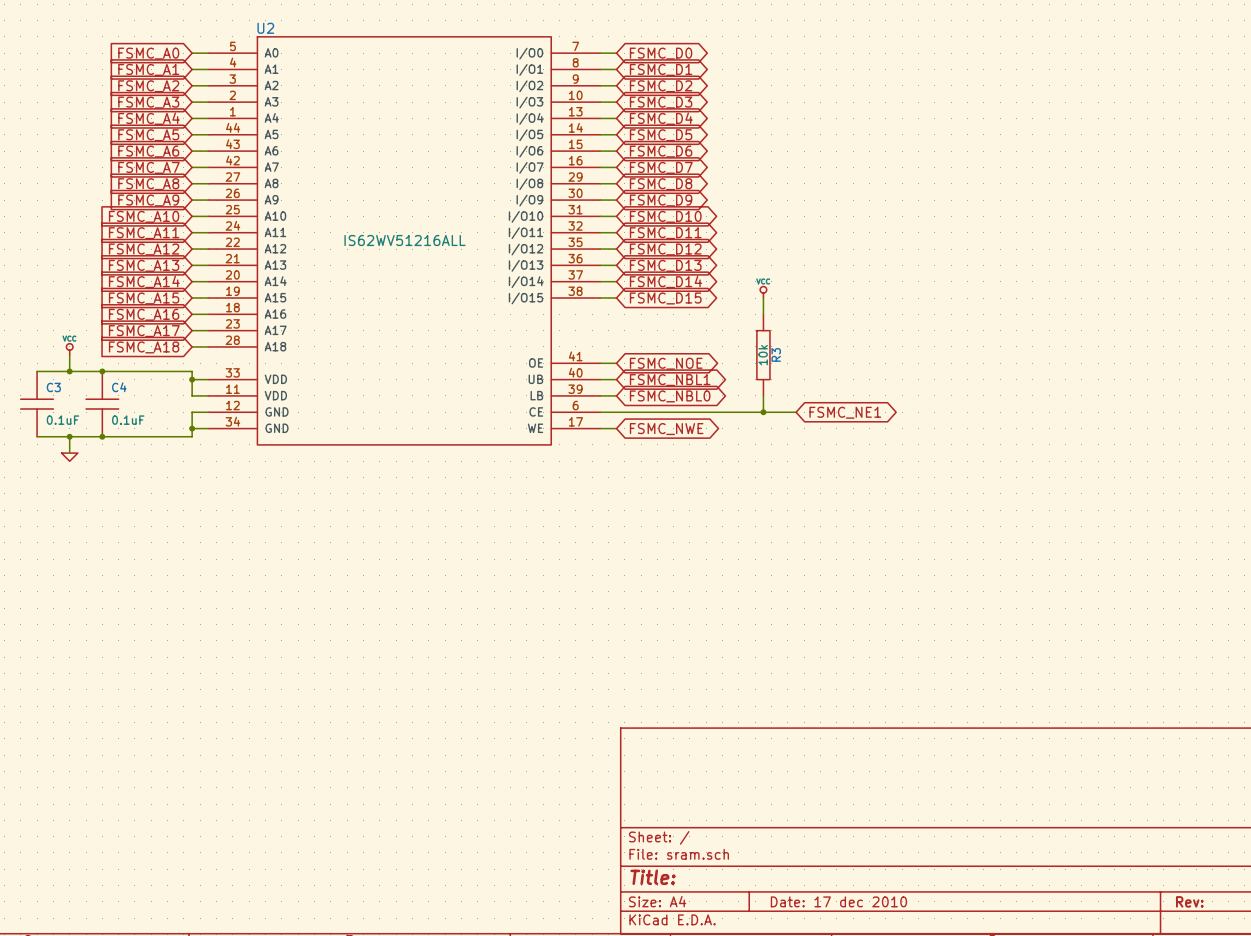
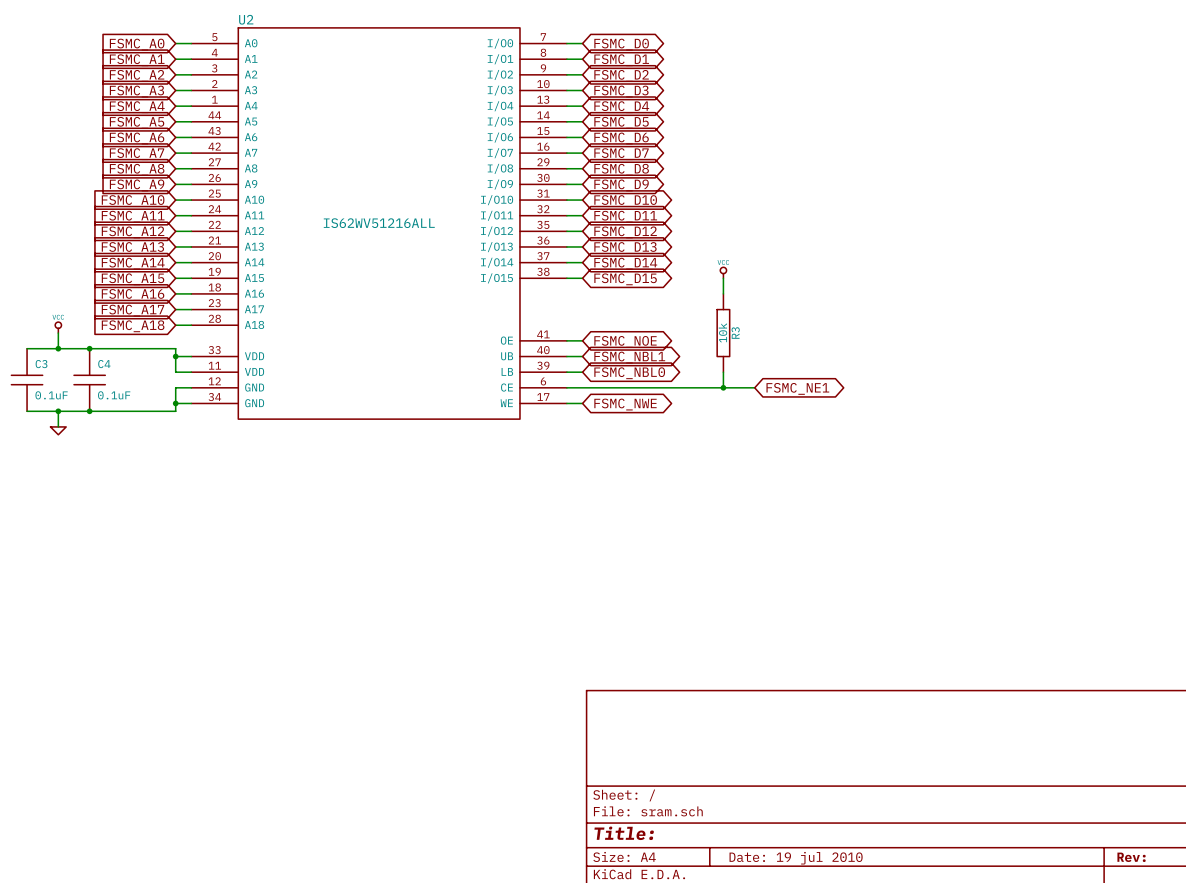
title block: Date: 17 dec 2010 (838, 901) -> Date: 19 jul 2010 (796, 858)

